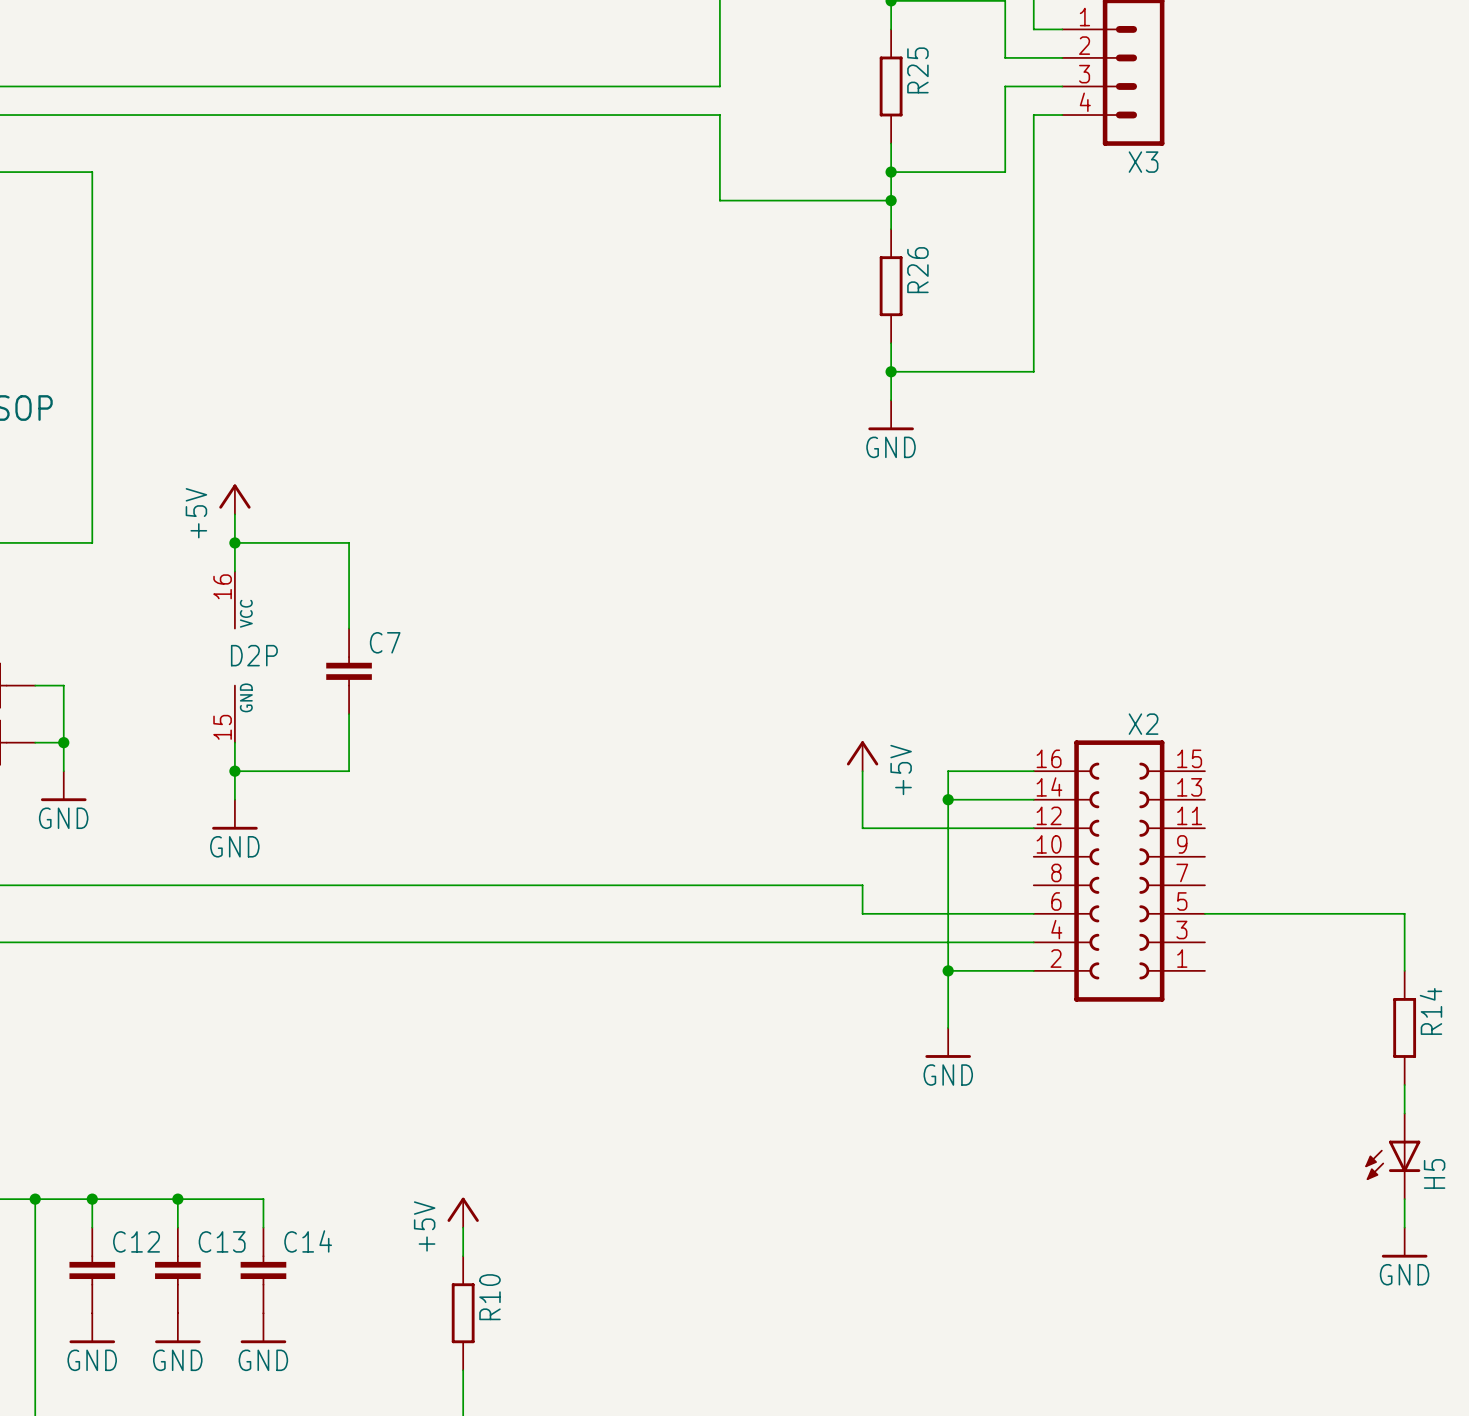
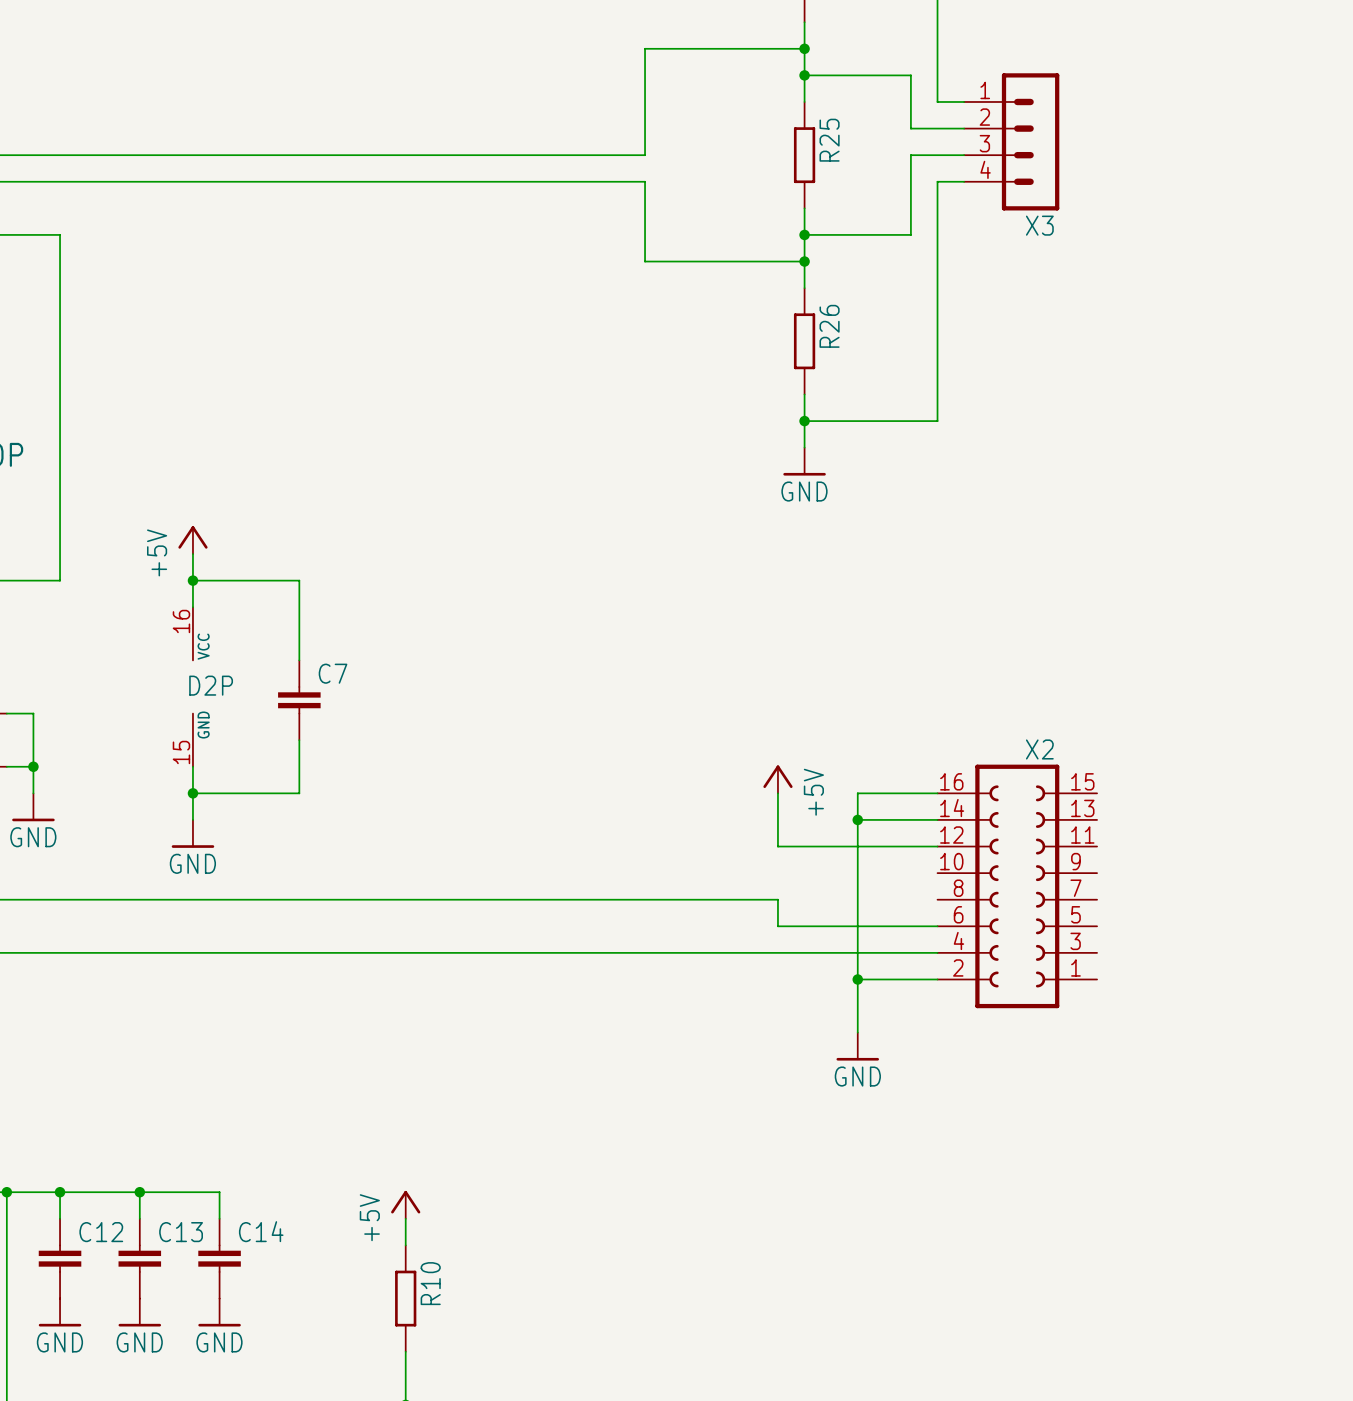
wire: (1204, 913) (1404, 913) (1404, 970) -> none
R14: (1404, 1027) -> none
wire: (1404, 1085) (1404, 1113) -> none
H5: (1392, 1156) -> none
wire: (1404, 1199) (1404, 1227) -> none
power symbol: GND (1404, 1242) -> none

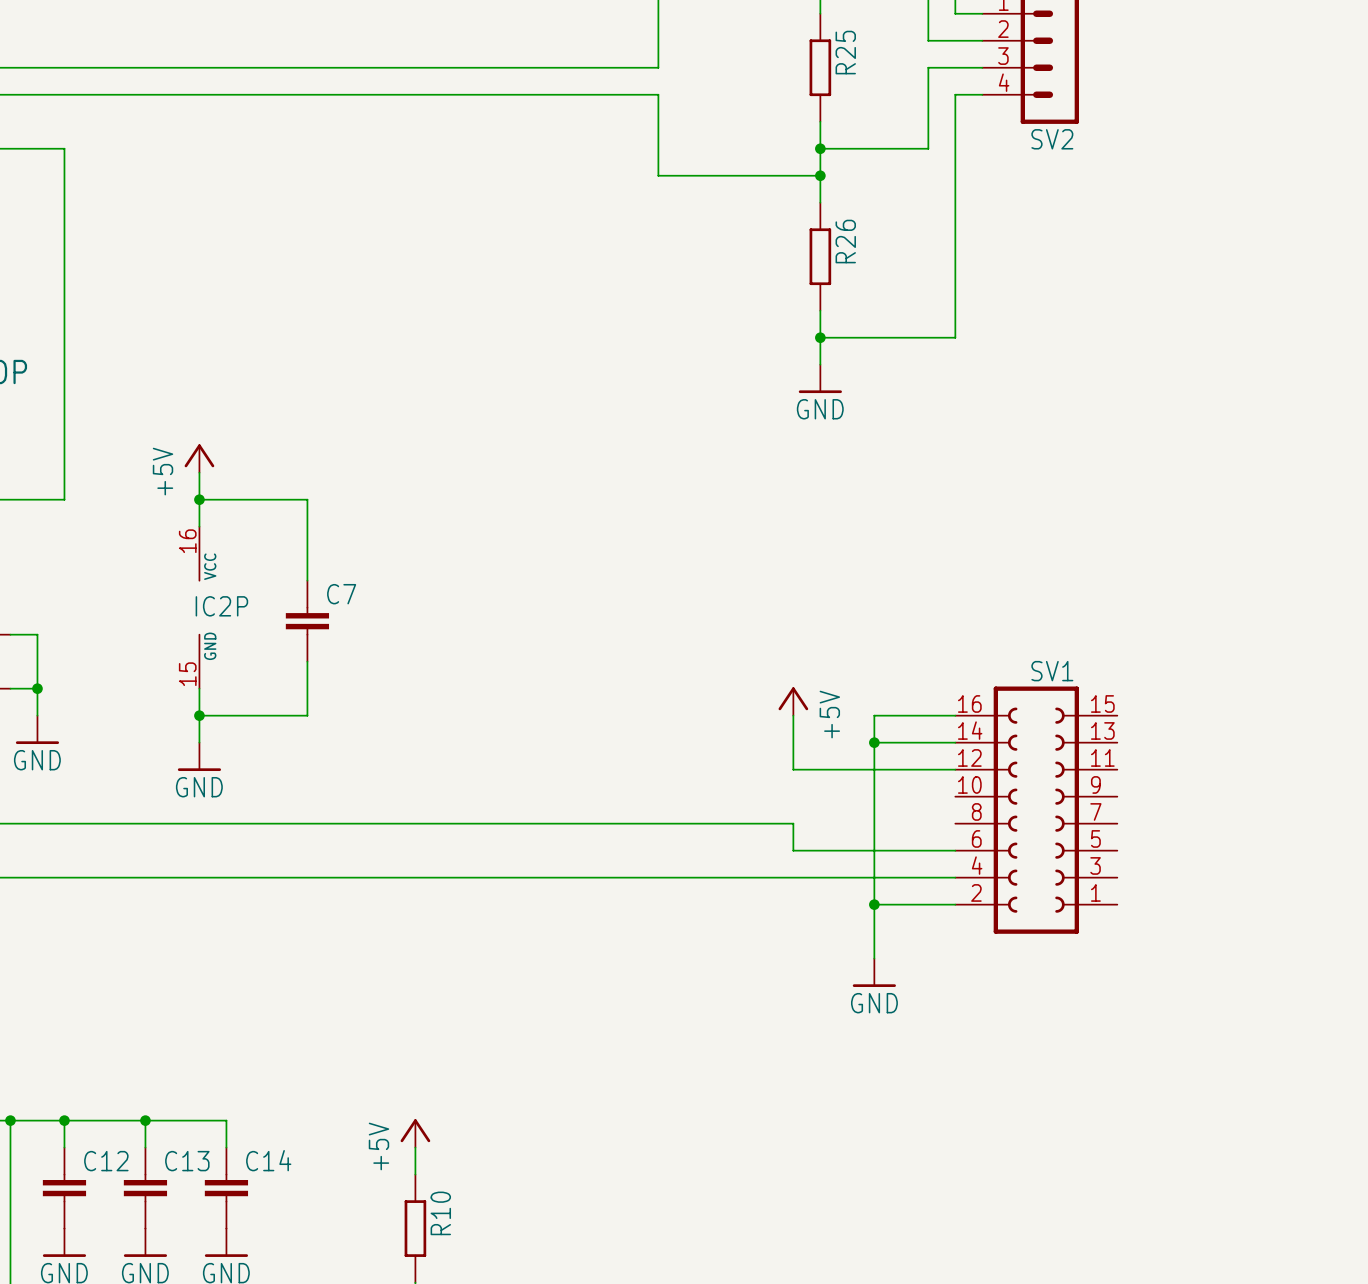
X3 name: X3 (1039, 225) -> SV2 (1052, 139)
D2P name: D2P (211, 685) -> IC2P (221, 606)
X2 name: X2 (1039, 749) -> SV1 (1052, 671)

